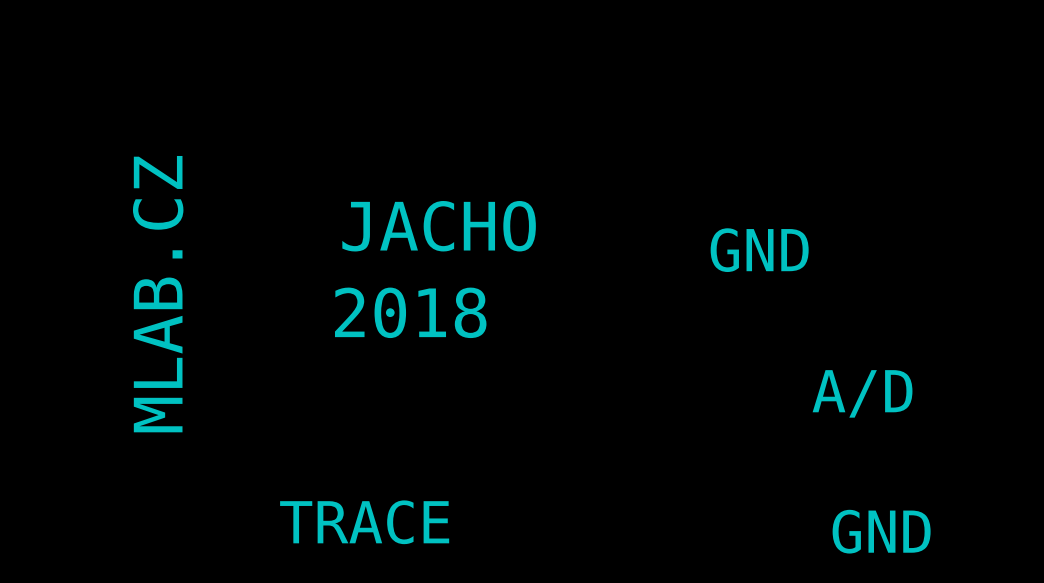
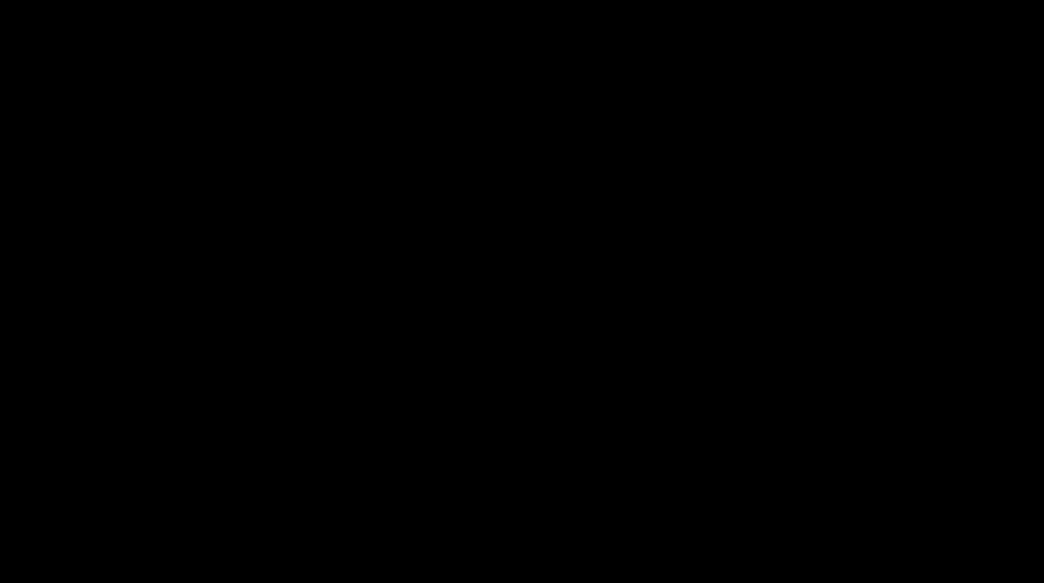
text: JACHO (439, 226) -> none
text: GND (759, 250) -> none
text: MLAB.CZ (158, 294) -> none
text: 2018 (410, 312) -> none
text: A/D (862, 393) -> none
text: TRACE (364, 522) -> none
text: GND (881, 531) -> none

